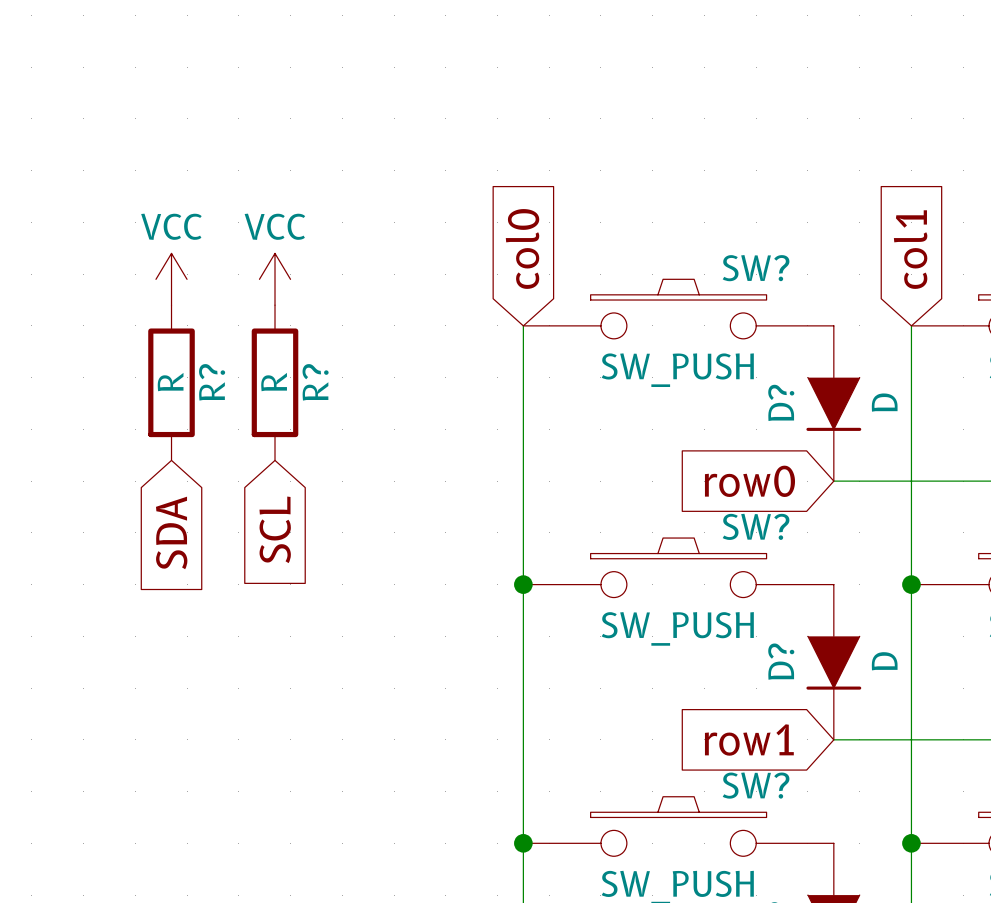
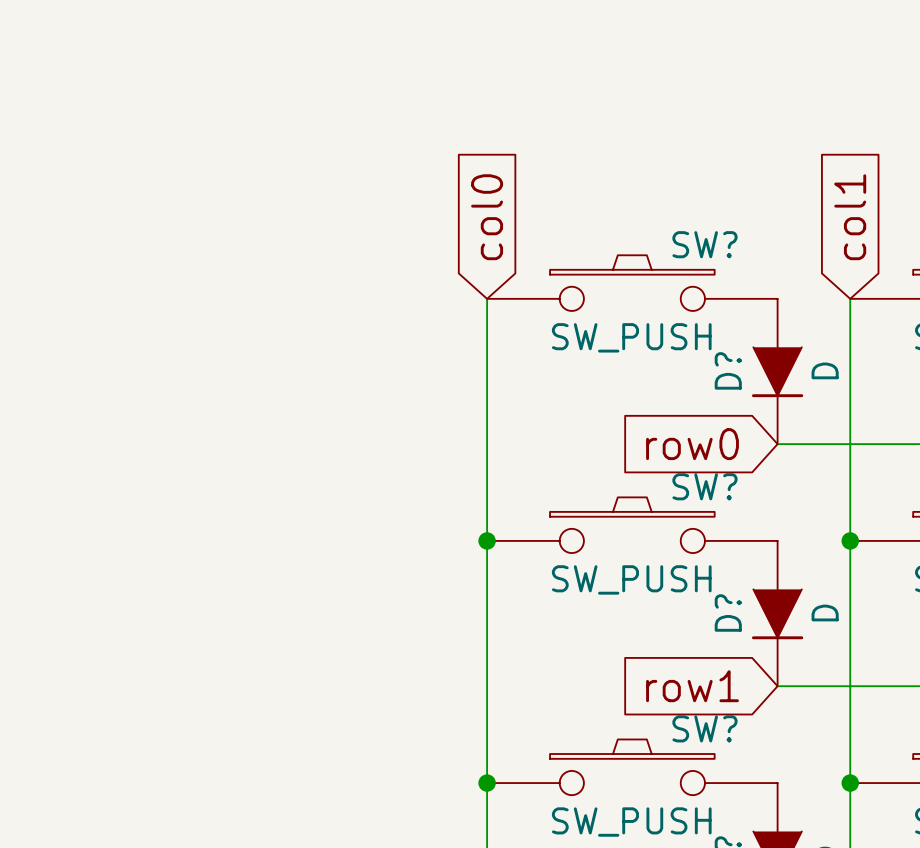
power symbol: VCC (171, 279) -> none
power symbol: VCC (275, 279) -> none
R?: R (171, 382) -> none
R?: R (275, 382) -> none
global label: SCL (275, 529) -> none
global label: SDA (171, 532) -> none

